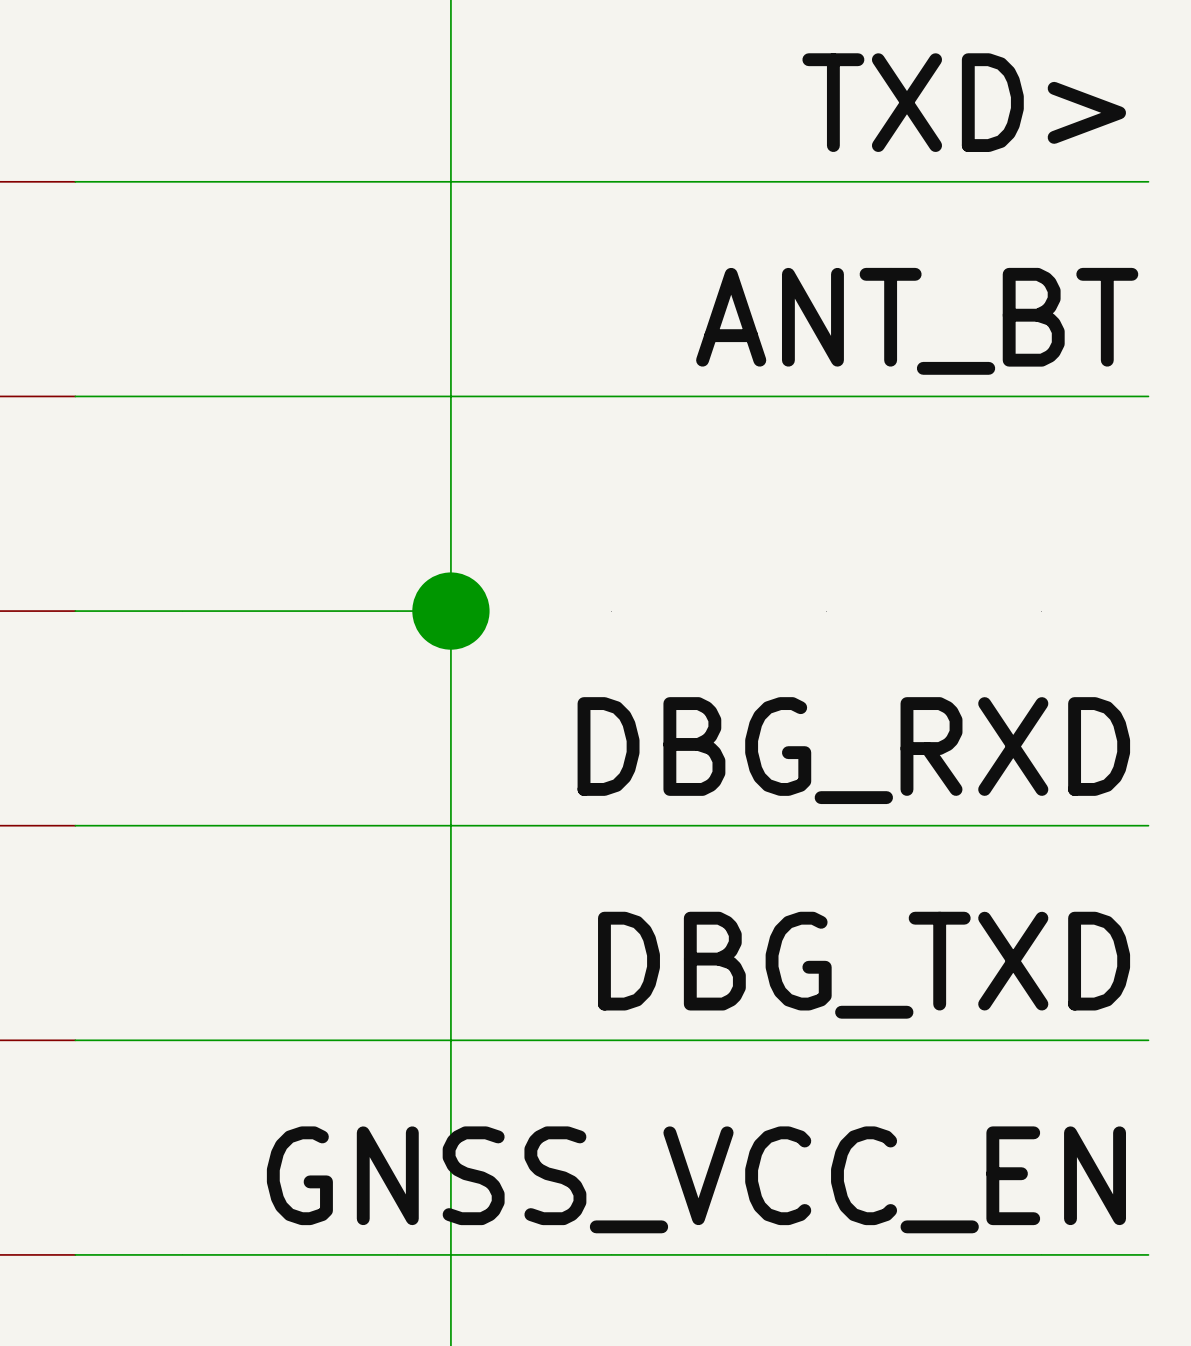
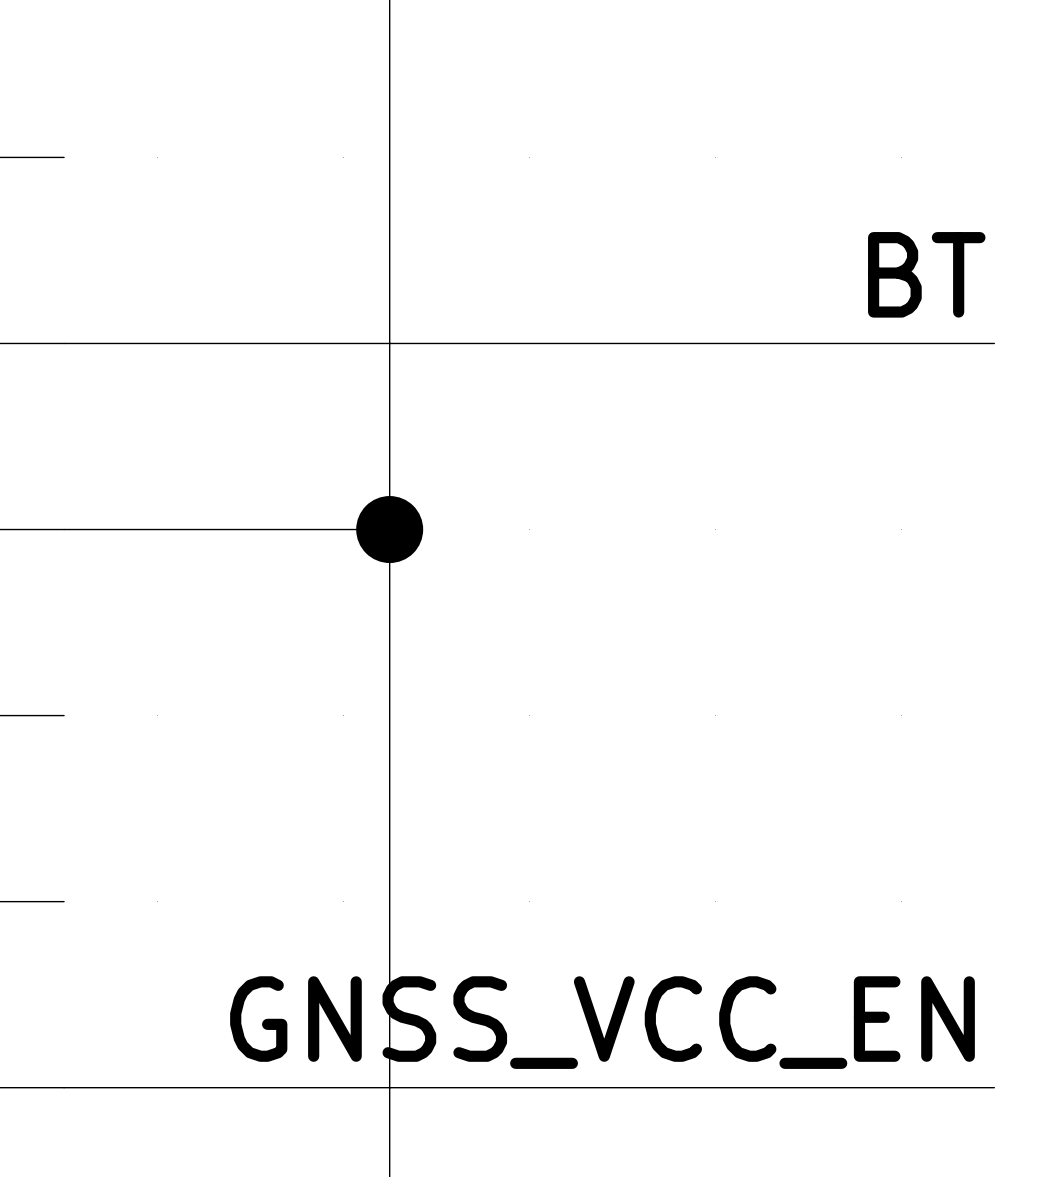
label: TXD> (964, 102) -> none
wire: (75, 181) (1148, 181) -> none
label: ANT_BT (917, 321) -> BT (926, 274)
label: DBG_RXD (853, 750) -> none
wire: (75, 825) (1148, 825) -> none
label: DBG_TXD (864, 965) -> none
wire: (75, 1040) (1148, 1040) -> none

